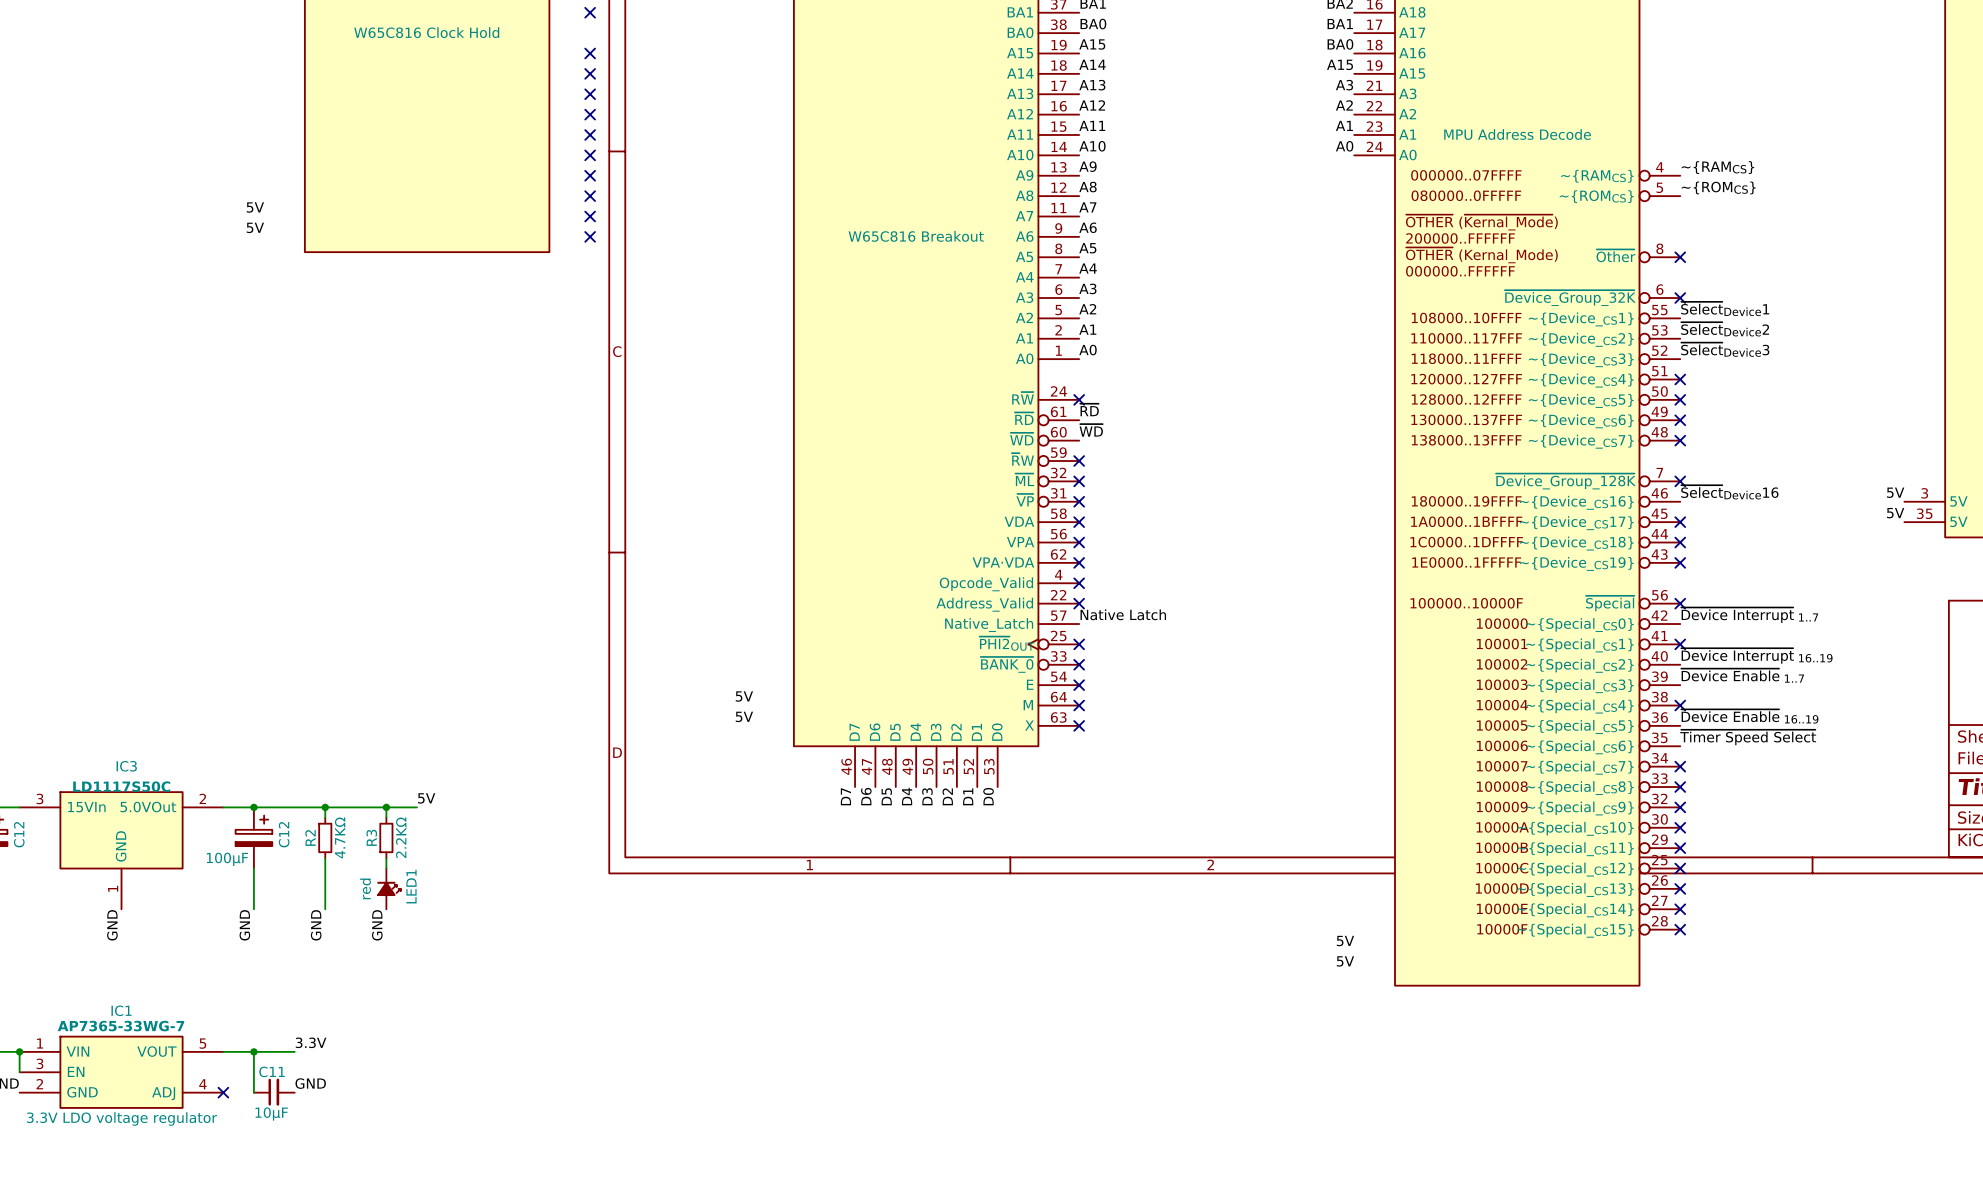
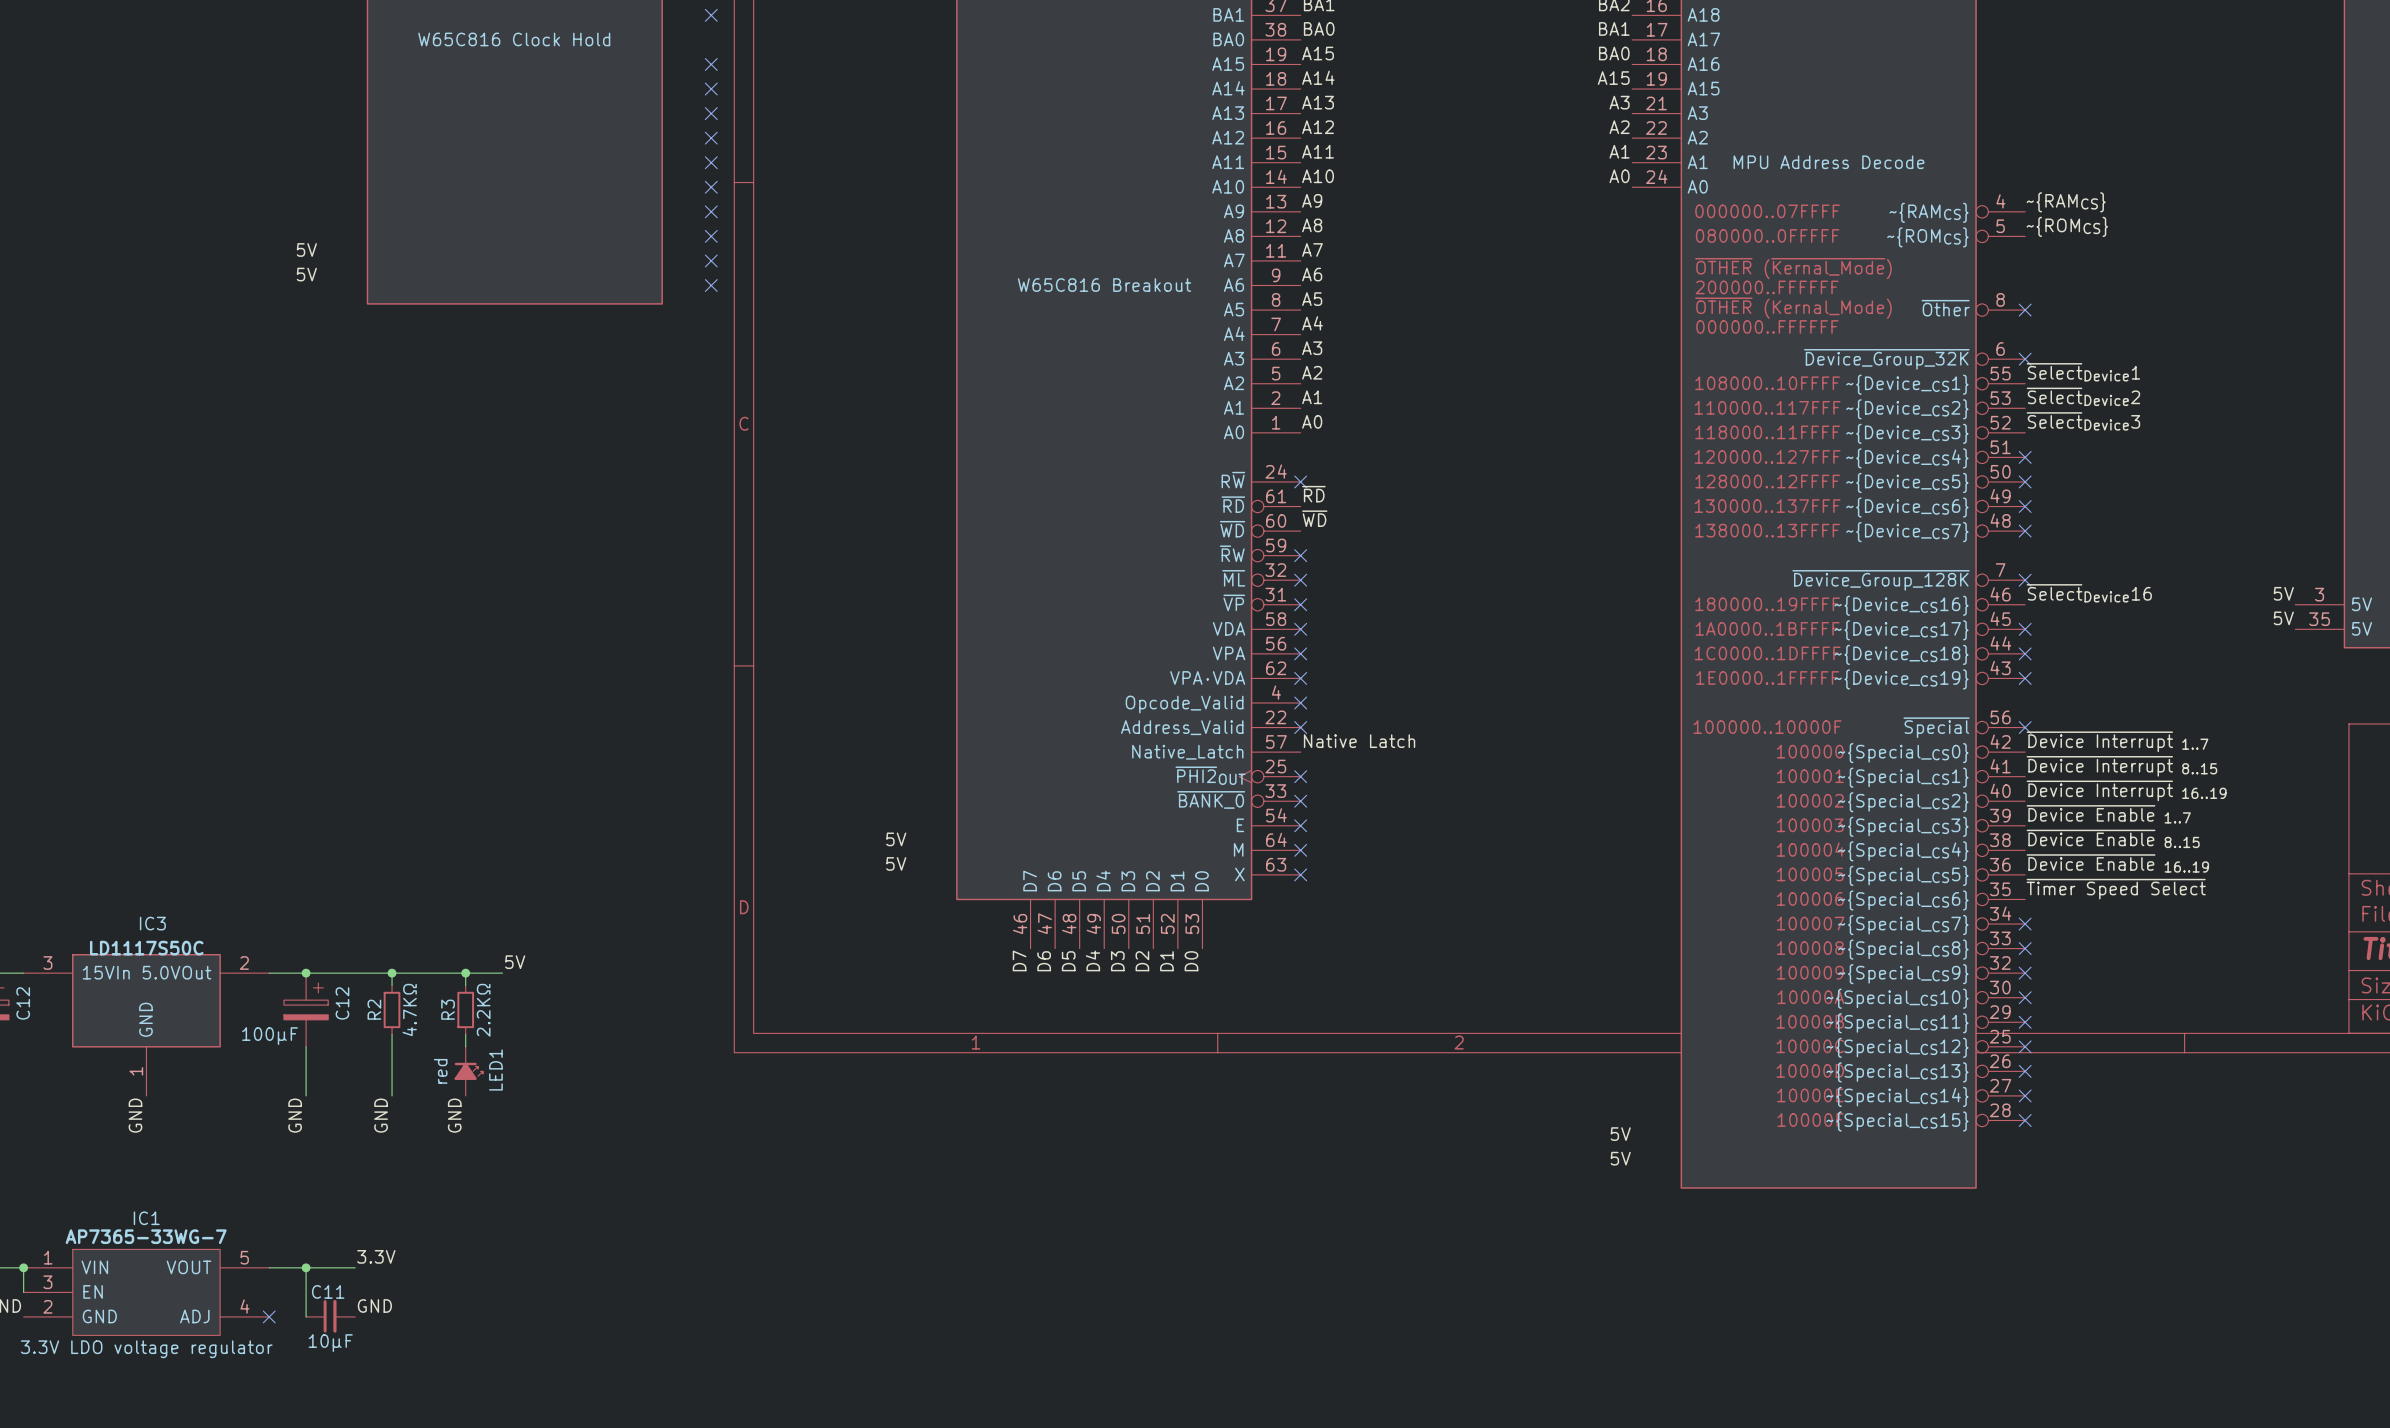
label: none -> ~{Device Interrupt} 8..15 (2121, 766)
no-connect mark: (1680, 644) -> none
label: none -> ~{Device Enable} 8..15 (2113, 838)
no-connect mark: (1680, 705) -> none

